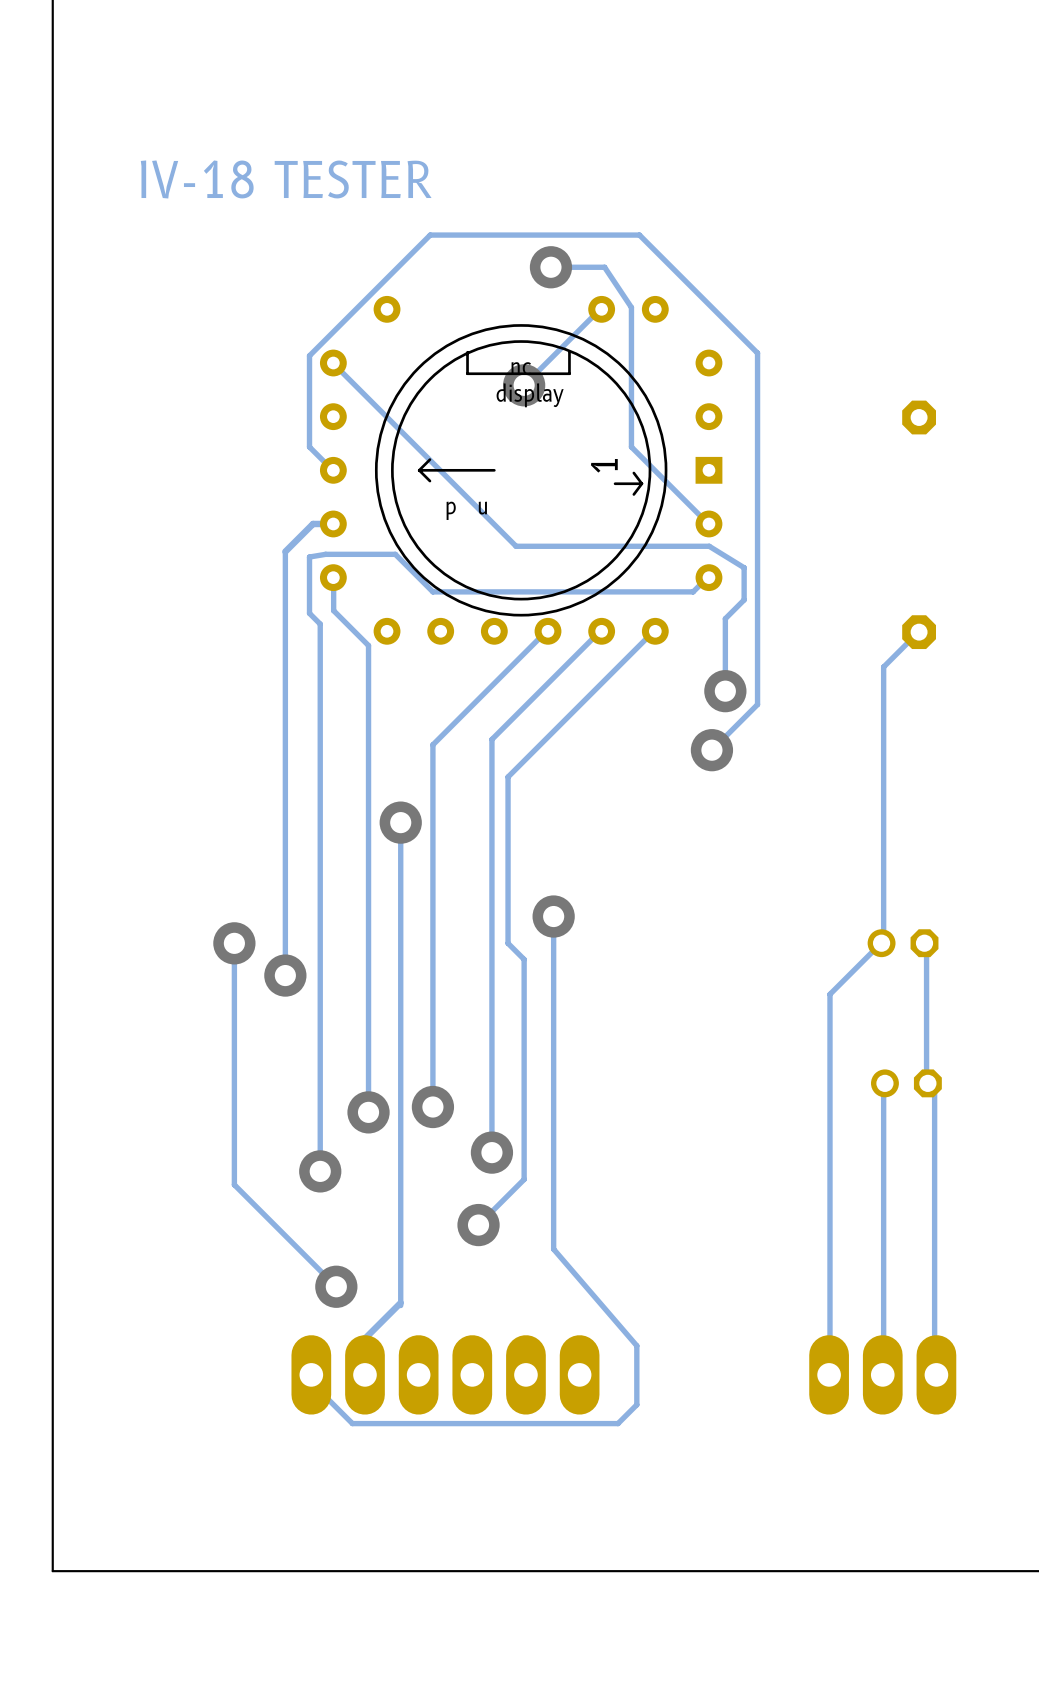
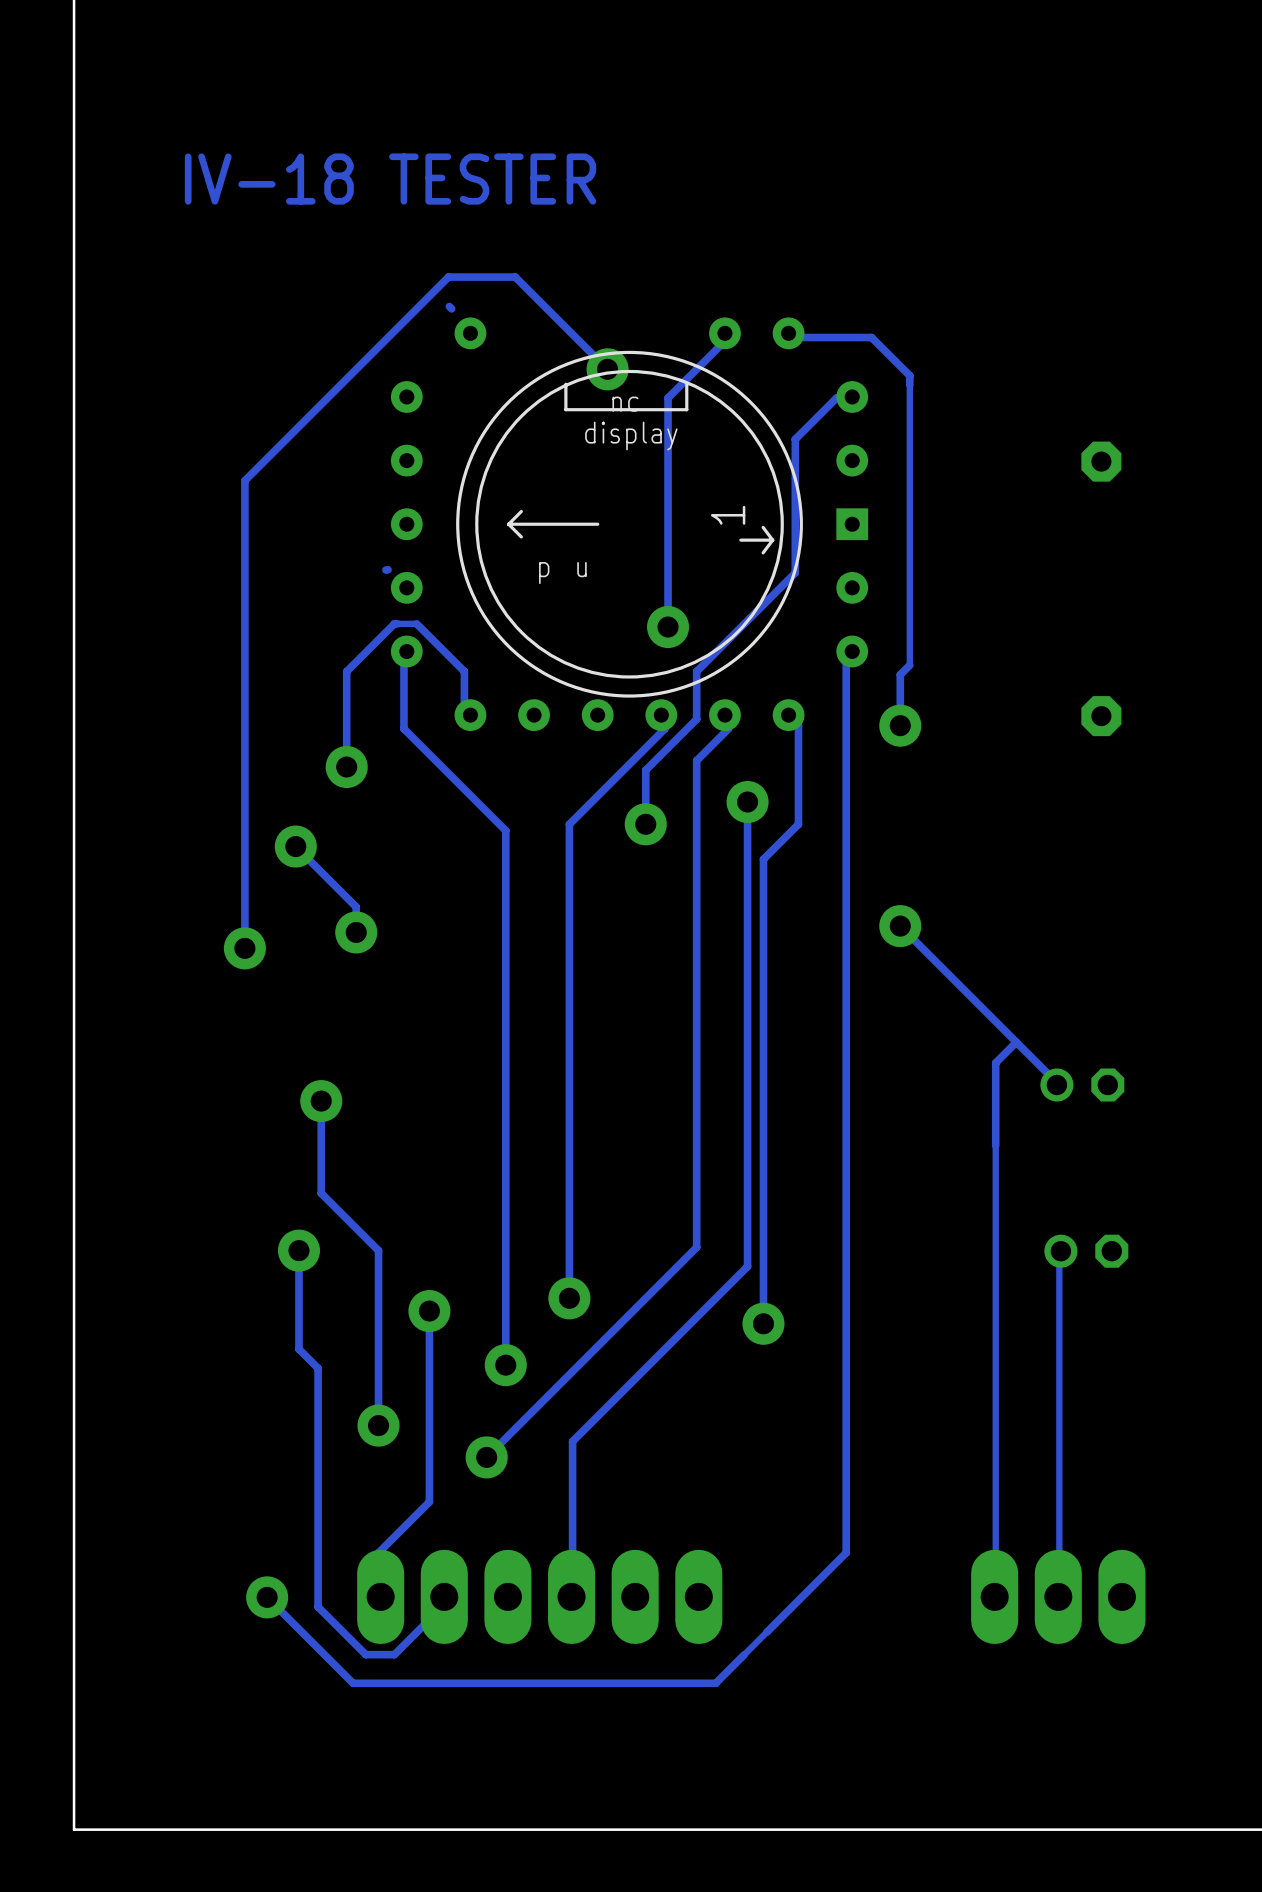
track: (550, 267) (604, 267) (631, 307) (631, 447) (708, 523) -> none
via: (550, 267) -> none
track: none -> (449, 306) (451, 308)
track: (599, 310) (524, 385) -> (722, 334) (722, 343) (668, 397) (668, 627)
track: none -> (607, 369) (515, 277) (448, 277) (244, 480) (244, 948)
via: none -> (607, 369)
track: (757, 353) (639, 235) (430, 235) (309, 355) (309, 447) (333, 470) -> (909, 385) (909, 375) (871, 337) (792, 337) (788, 333)
track: (333, 363) (516, 546) (709, 546) (744, 567) (744, 599) (725, 618) (725, 691) -> none
track: none -> (852, 396) (836, 397) (795, 439) (795, 572) (696, 671) (696, 719) (645, 770) (645, 824)
via: (524, 385) -> none
track: none -> (388, 569) (385, 570)
track: (333, 523) (313, 523) (285, 551) (285, 975) -> none
track: (325, 554) (309, 557) (309, 613) (320, 624) (320, 1171) -> (397, 623) (394, 623) (346, 671) (346, 767)
track: (341, 554) (395, 554) (432, 591) (693, 591) (703, 581) -> (416, 623) (464, 671) (464, 709) (470, 715)
via: none -> (668, 627)
track: (333, 577) (333, 610) (368, 645) (368, 1112) -> (406, 651) (403, 652) (403, 728) (505, 830) (505, 1365)
track: (757, 589) (757, 704) (711, 750) -> (909, 665) (900, 674) (900, 725)
track: (548, 631) (432, 744) (432, 1107) -> (661, 715) (664, 719) (664, 728) (569, 824) (569, 1298)
track: (601, 631) (491, 739) (491, 1152) -> (724, 715) (728, 719) (728, 728) (696, 760) (696, 1247) (486, 1457)
track: (655, 631) (508, 777) (508, 943) (524, 959) (524, 1179) (478, 1225) -> (788, 715) (798, 725) (798, 824) (763, 859) (763, 1323)
track: (919, 632) (883, 667) (883, 940) (829, 994) -> (1016, 1042) (995, 1062) (995, 1145)
via: none -> (900, 725)
via: none -> (346, 767)
via: (725, 691) -> none
track: none -> (747, 802) (747, 1266) (572, 1441) (571, 1596)
via: none -> (747, 802)
via: none -> (645, 824)
track: none -> (295, 846) (356, 907) (356, 932)
via: none -> (295, 846)
via: (711, 750) -> none
track: none -> (900, 926) (1056, 1081) (1056, 1084)
via: none -> (900, 926)
via: none -> (356, 932)
track: (400, 822) (400, 1305) -> none
via: (400, 822) -> none
via: none -> (244, 948)
track: (553, 916) (553, 1249) (636, 1345) (636, 1404) -> (846, 655) (846, 1552) (766, 1632)
via: (553, 916) -> none
track: (234, 943) (234, 1184) (336, 1286) -> none
via: (234, 943) -> none
track: (924, 943) (926, 943) (926, 1082) (934, 1090) (934, 1372) (936, 1374) -> none
track: none -> (321, 1101) (321, 1193) (378, 1250) (378, 1425)
via: none -> (321, 1101)
via: (285, 975) -> none
via: none -> (298, 1250)
via: (432, 1107) -> none
via: (368, 1112) -> none
via: none -> (569, 1298)
track: none -> (429, 1311) (429, 1501) (378, 1552) (378, 1594) (380, 1596)
via: none -> (429, 1311)
via: none -> (763, 1323)
via: (491, 1152) -> none
via: (320, 1171) -> none
via: none -> (505, 1365)
via: (478, 1225) -> none
via: none -> (378, 1425)
via: none -> (486, 1457)
via: (336, 1286) -> none
track: (400, 1302) (364, 1338) (364, 1374) -> (298, 1250) (298, 1349) (318, 1368) (318, 1606) (365, 1654) (394, 1654) (442, 1606) (442, 1597) (444, 1596)
track: (311, 1374) (312, 1383) (352, 1423) (618, 1423) -> (267, 1597) (353, 1683) (715, 1683) (744, 1654)
via: none -> (267, 1597)

